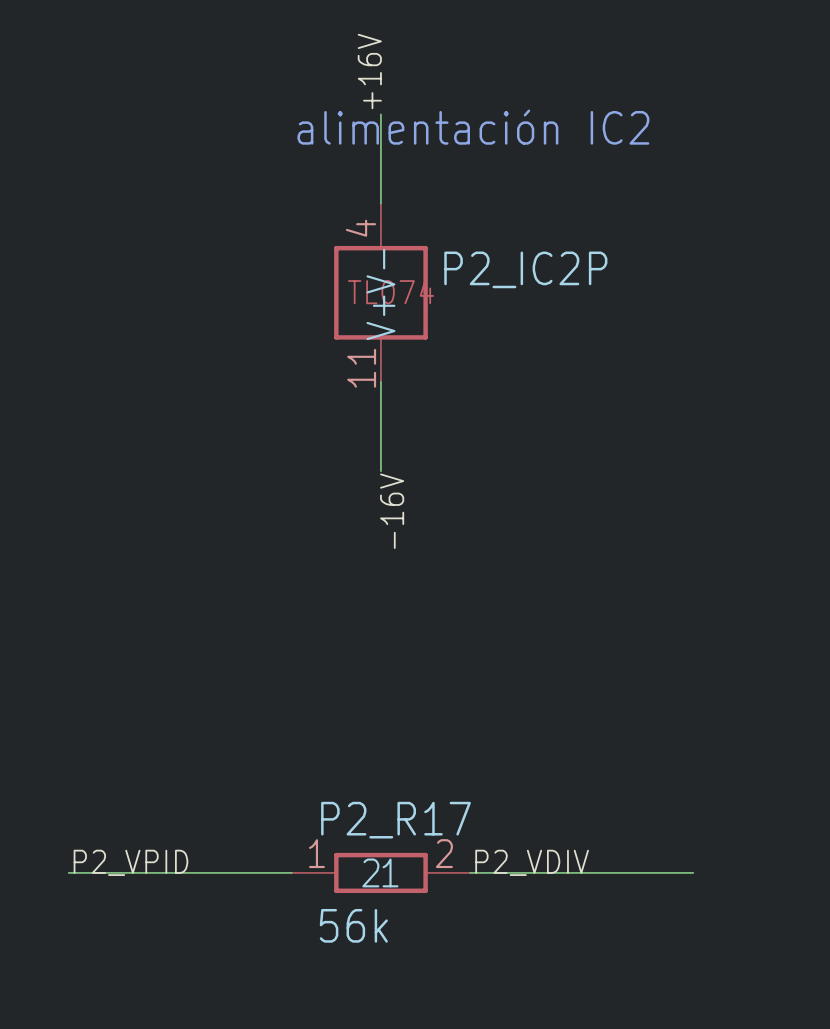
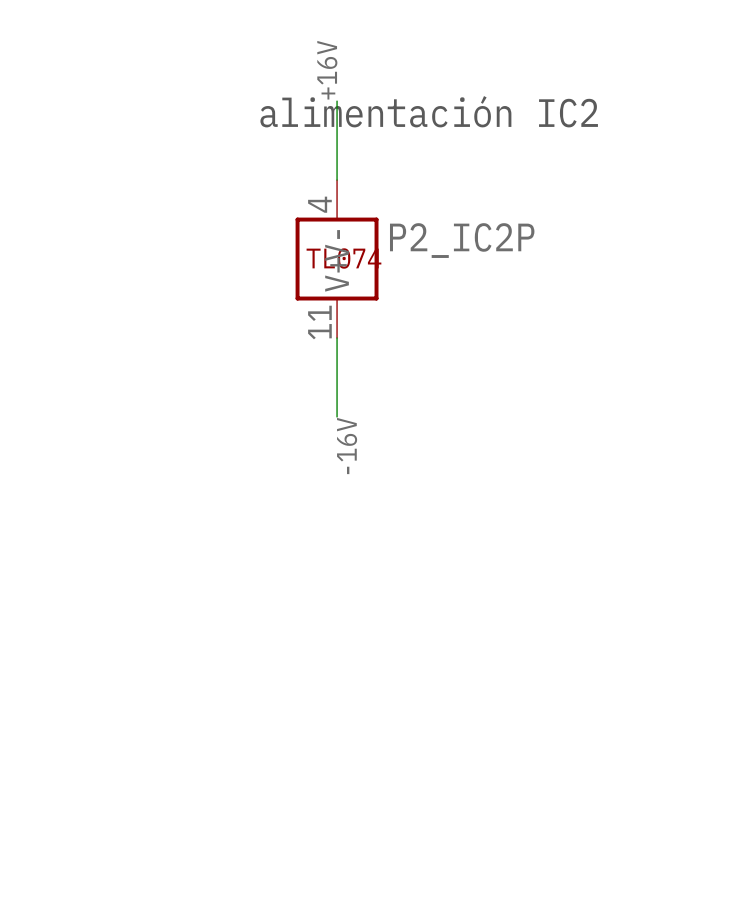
label: P2_VPID (130, 862) -> none
label: P2_VDIV (532, 862) -> none
wire: (68, 872) (291, 872) -> none
P2_R17: 56k (380, 872) -> none
wire: (470, 872) (693, 872) -> none

